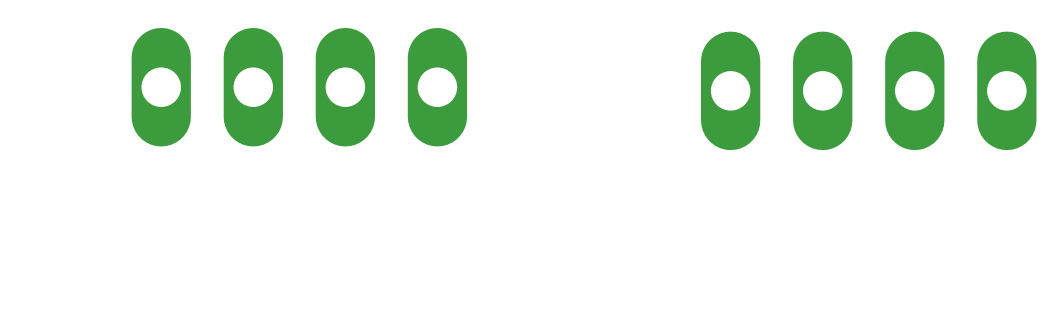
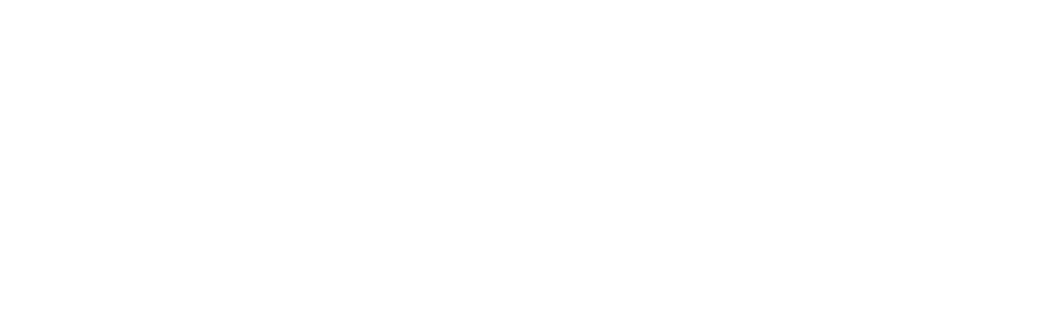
part: (299, 87) -> none
part: (868, 90) -> none

